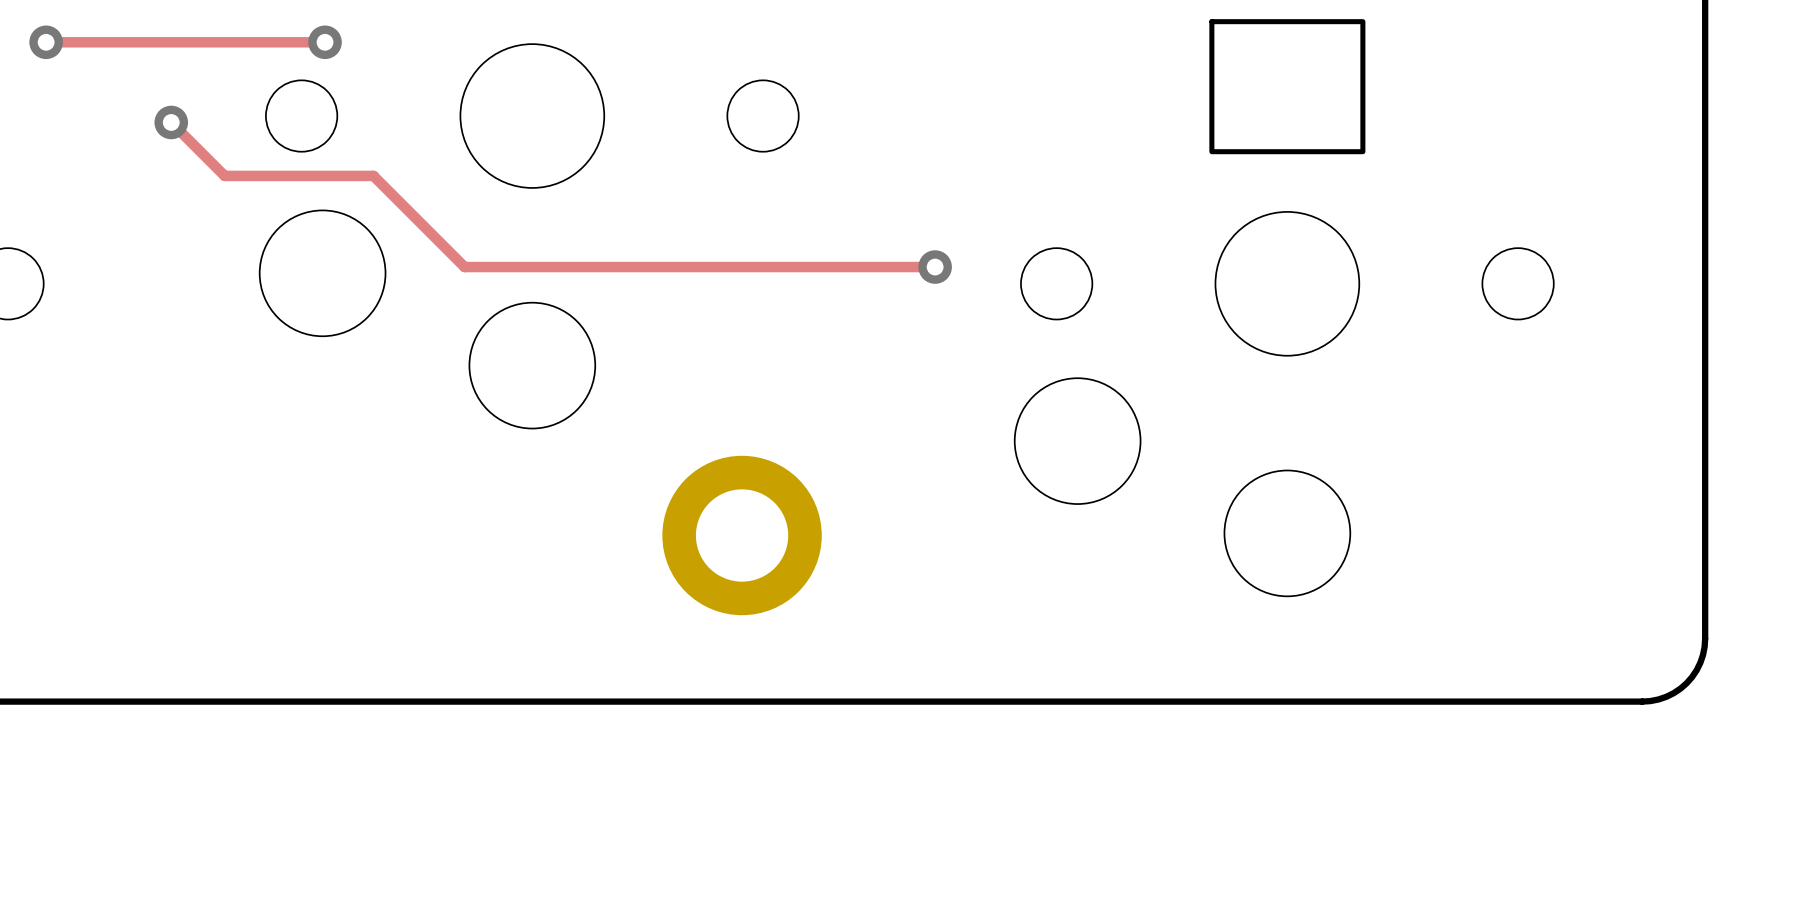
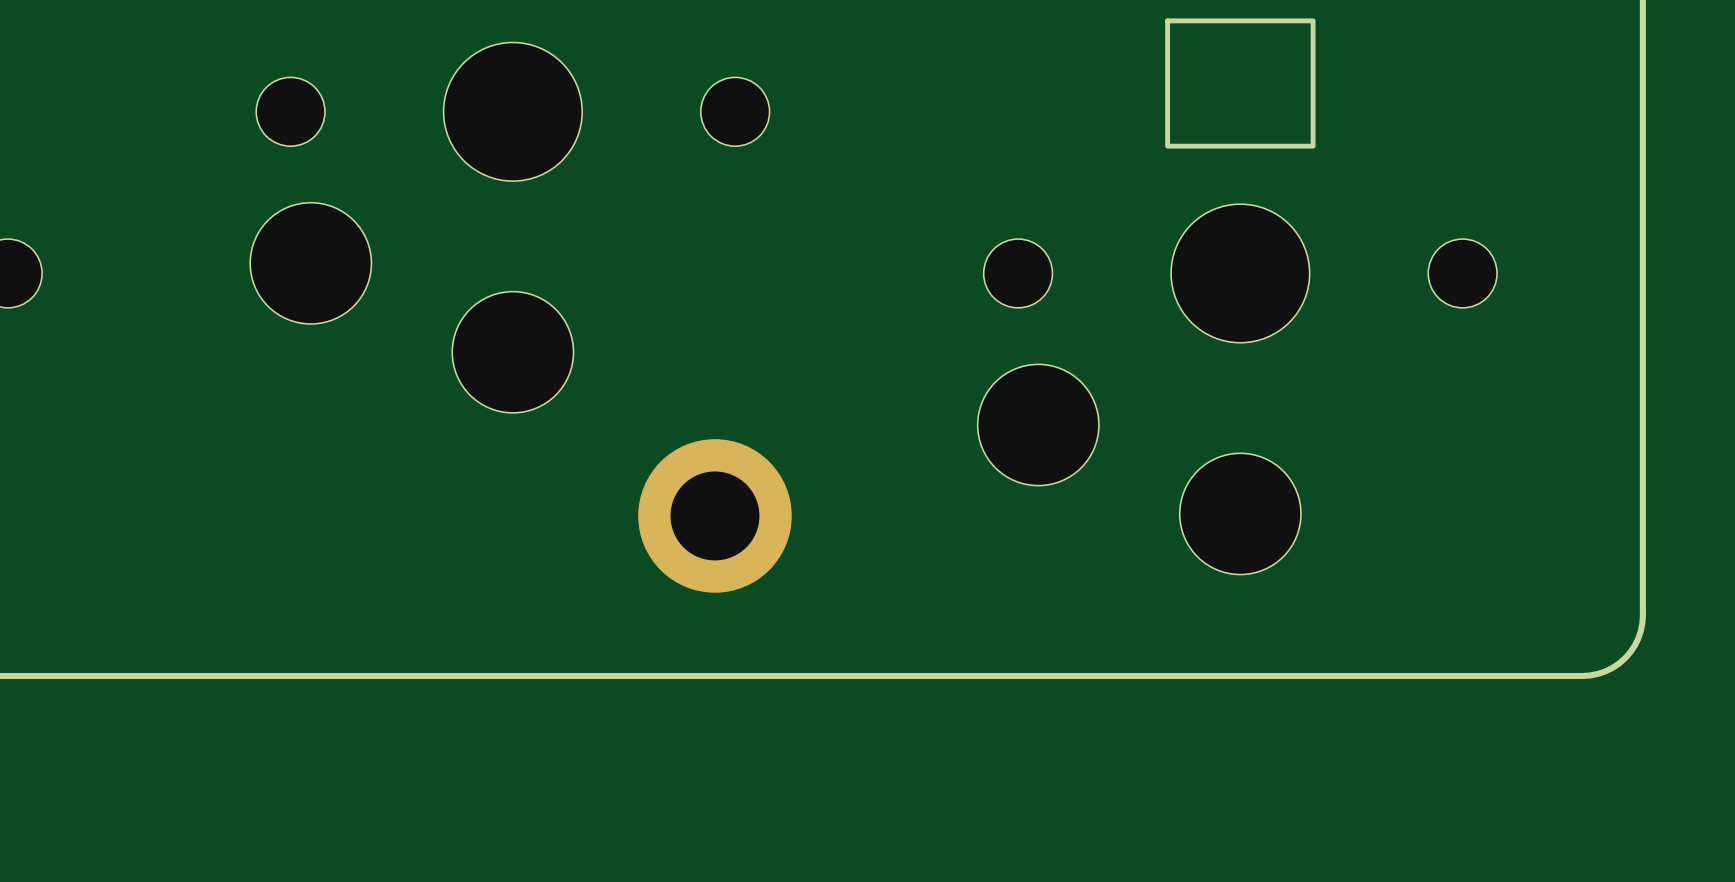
track: (46, 42) (325, 42) -> none
via: (46, 42) -> none
via: (325, 42) -> none
track: (171, 122) (224, 175) (373, 175) (464, 267) (935, 267) -> none
via: (171, 122) -> none
via: (935, 267) -> none

